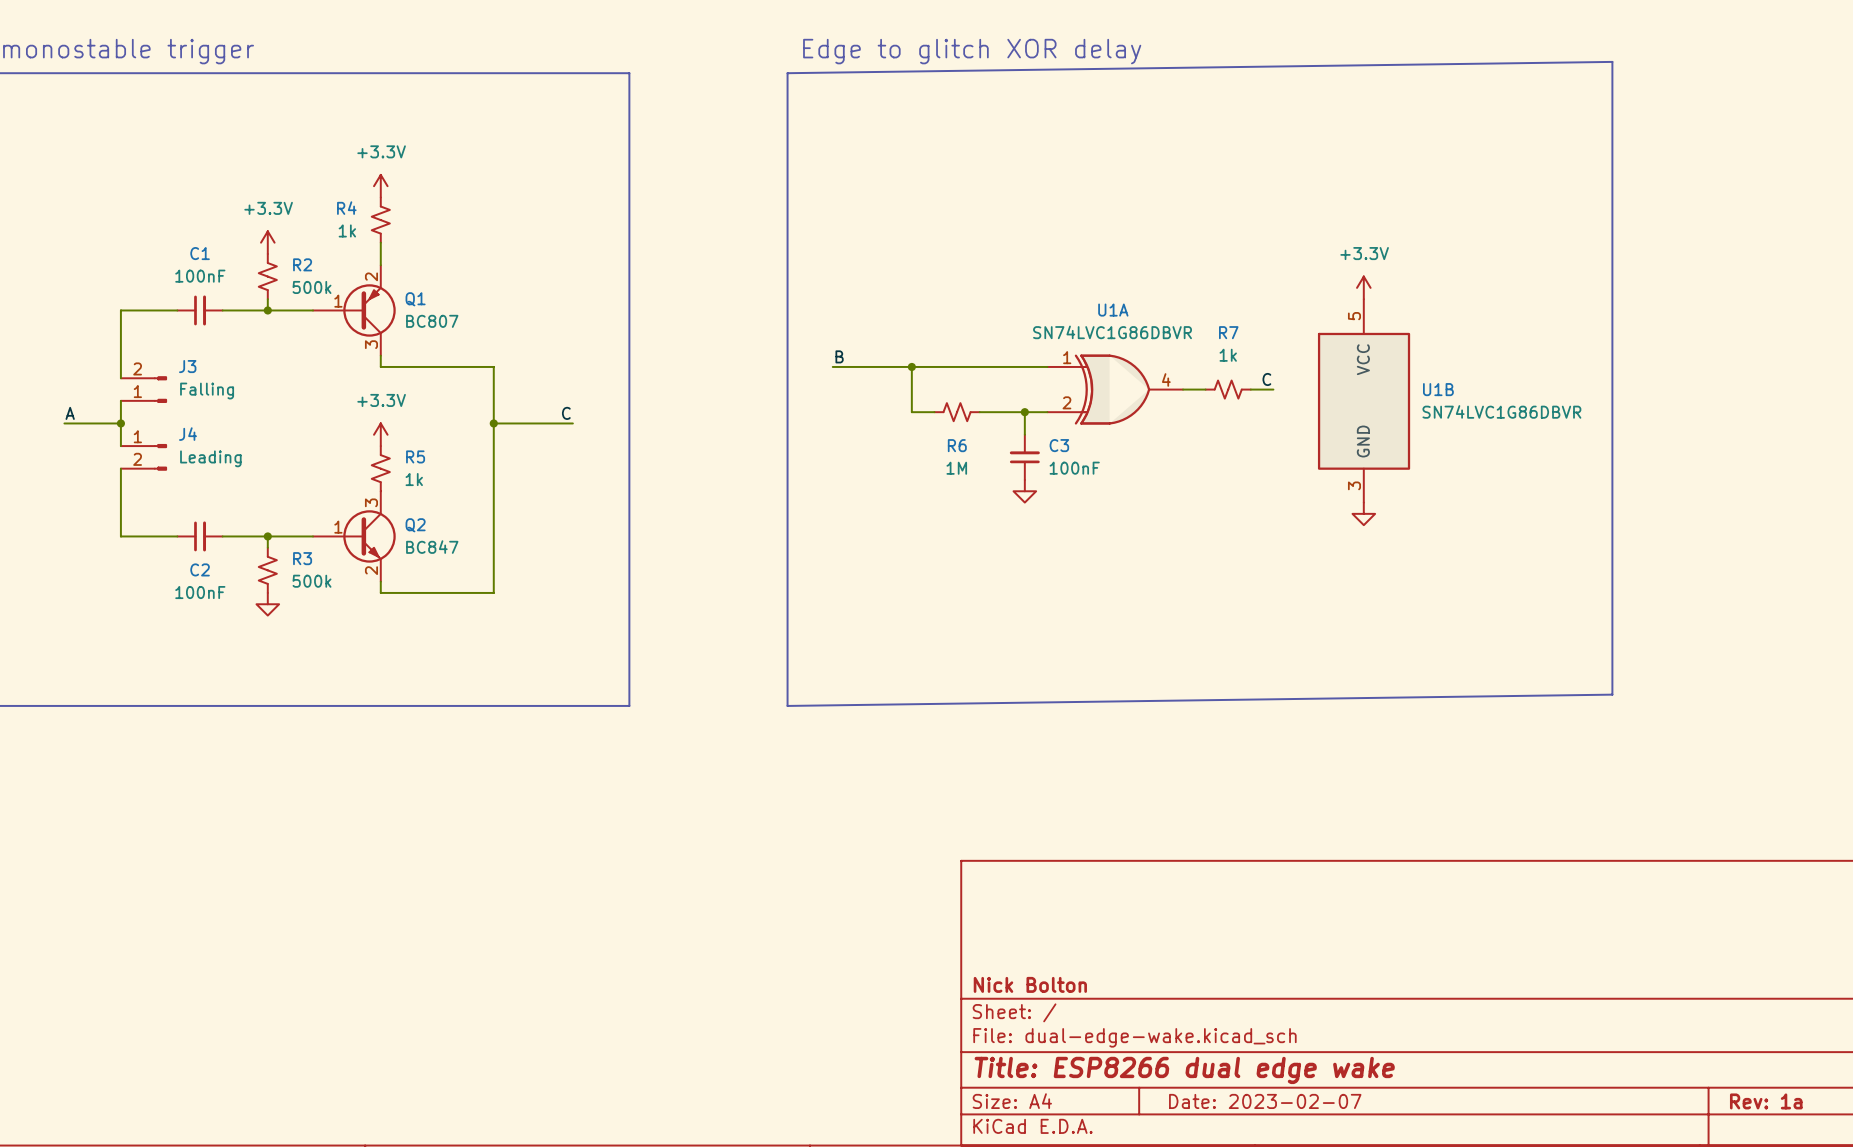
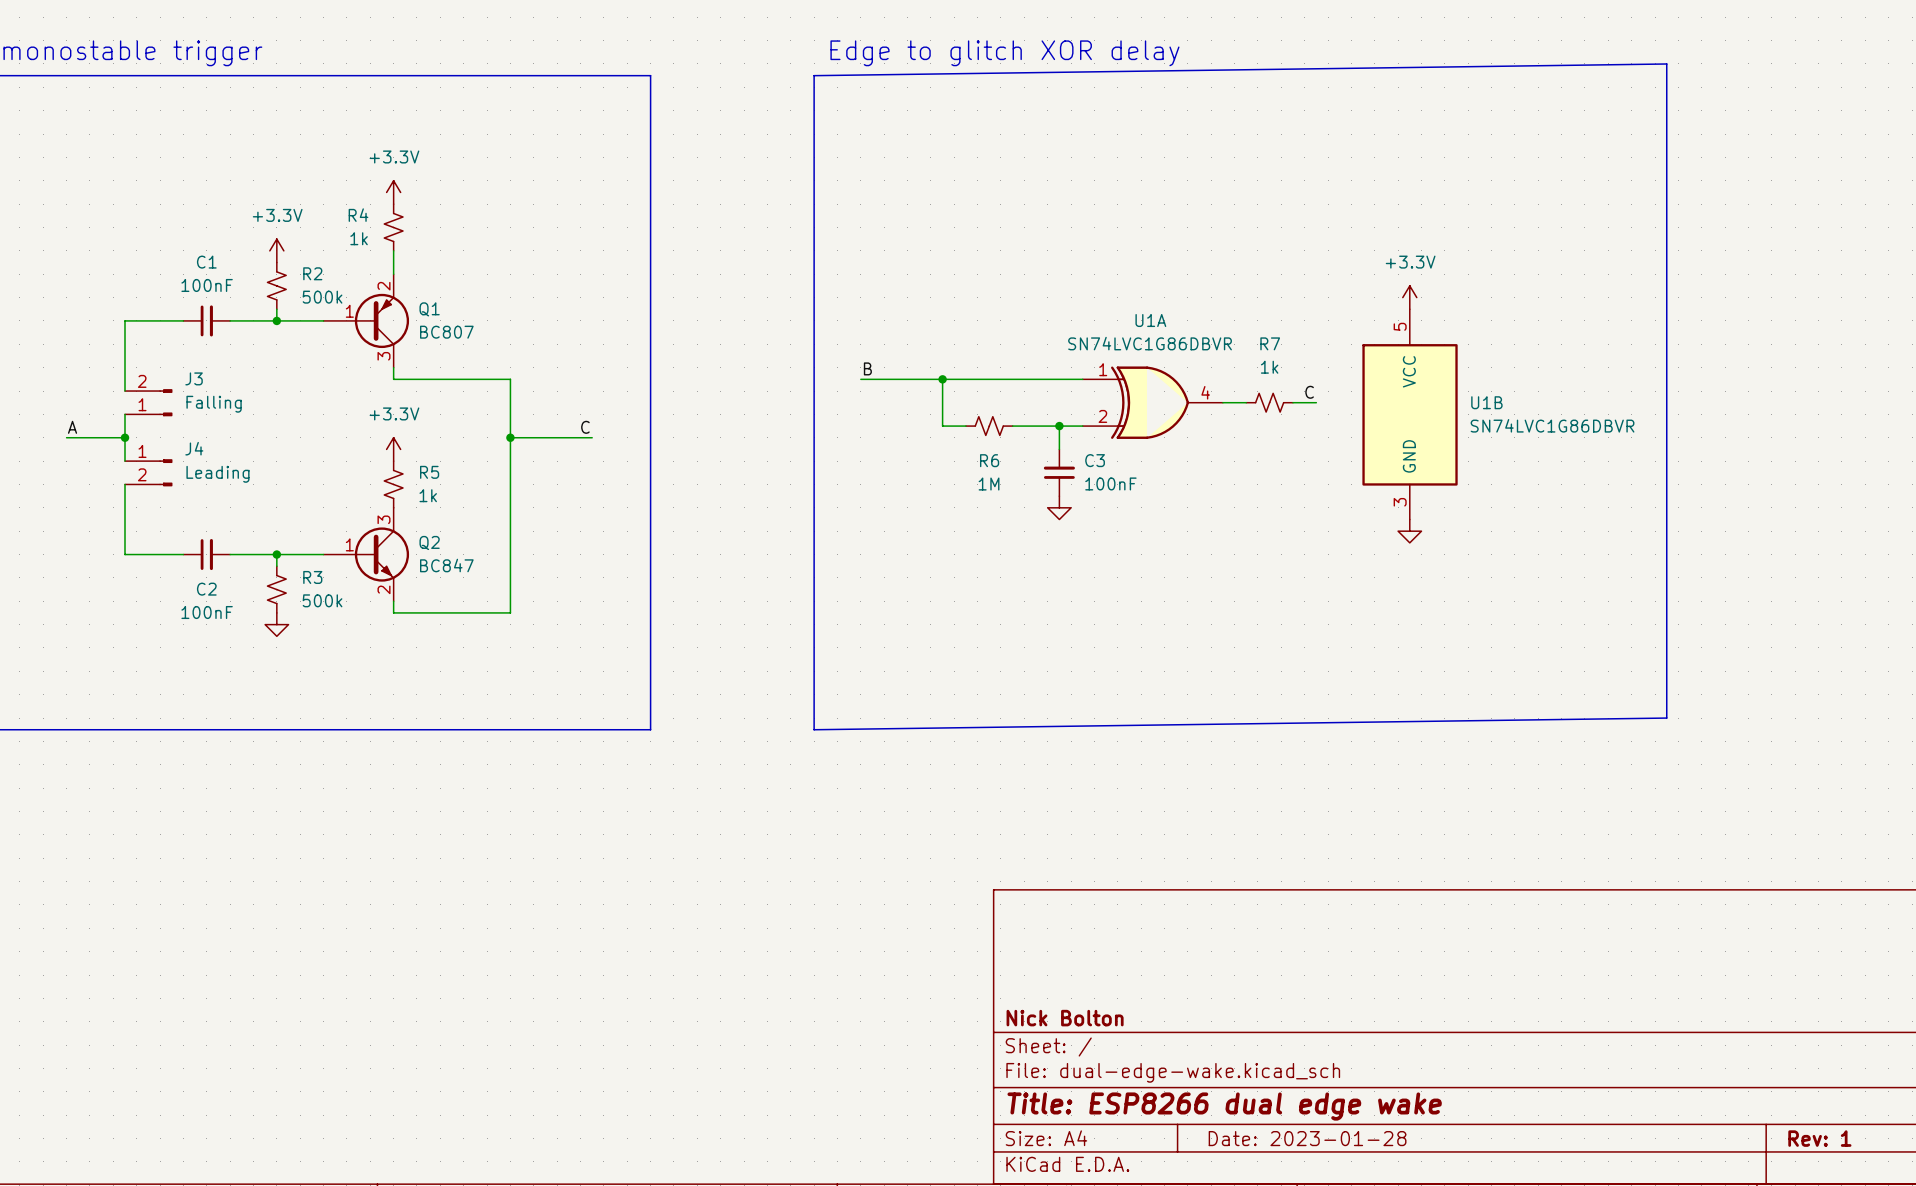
title block: Date: 2023-02-07 (1265, 1101) -> Date: 2023-01-28 (1307, 1138)
title block: Rev: 1a (1766, 1101) -> Rev: 1 (1819, 1138)

